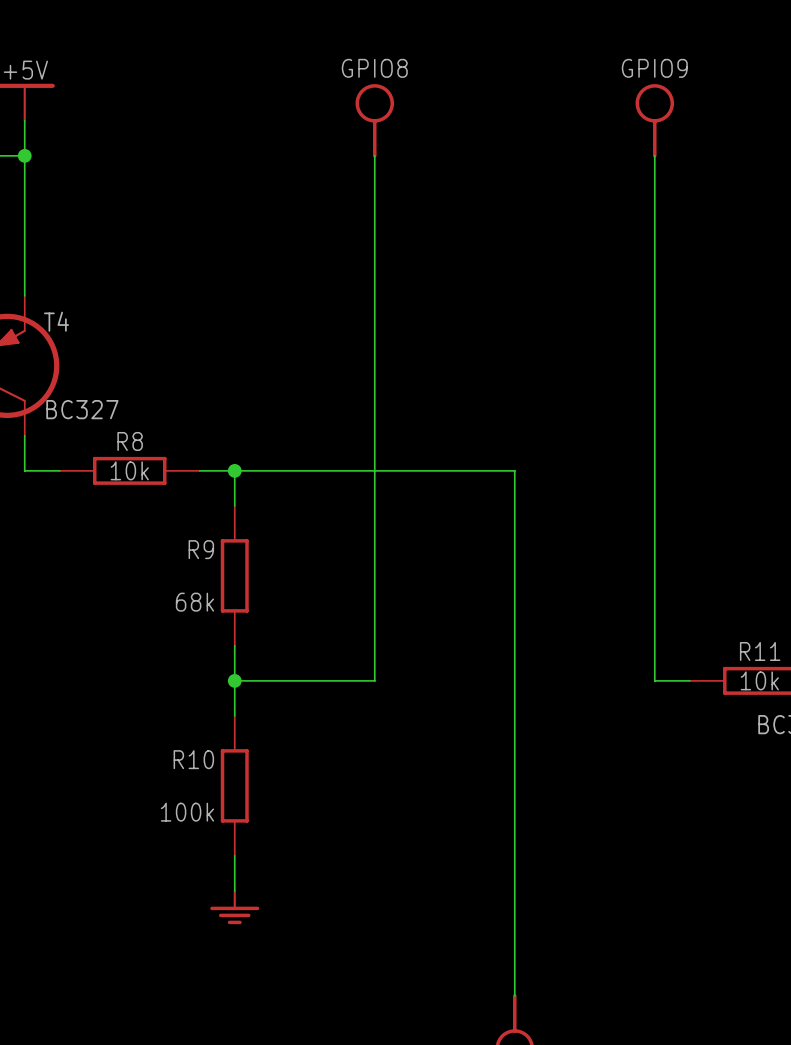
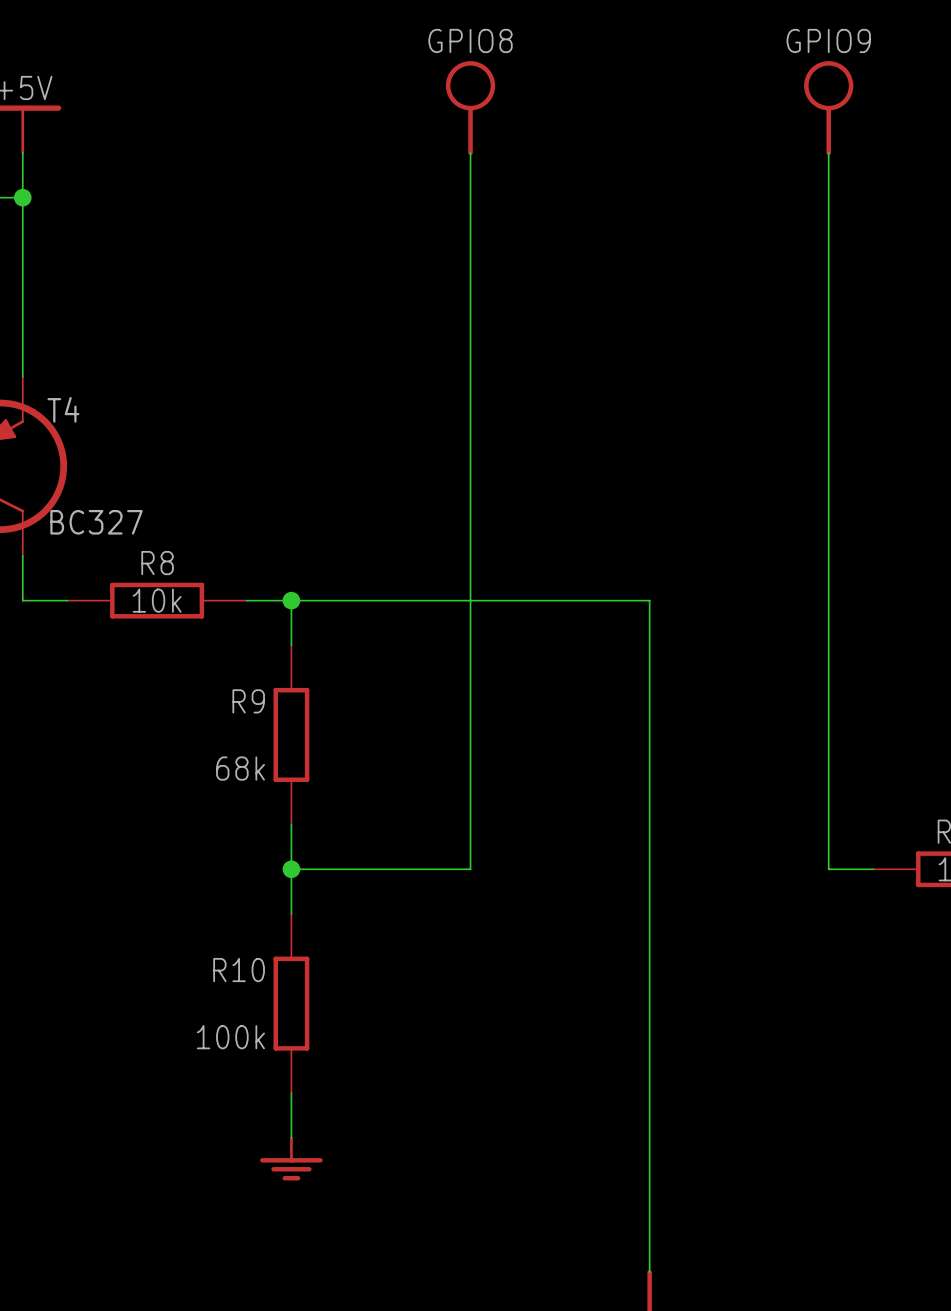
GPIO8 position: (374, 120) -> (470, 108)
GPIO9 position: (654, 120) -> (828, 108)

